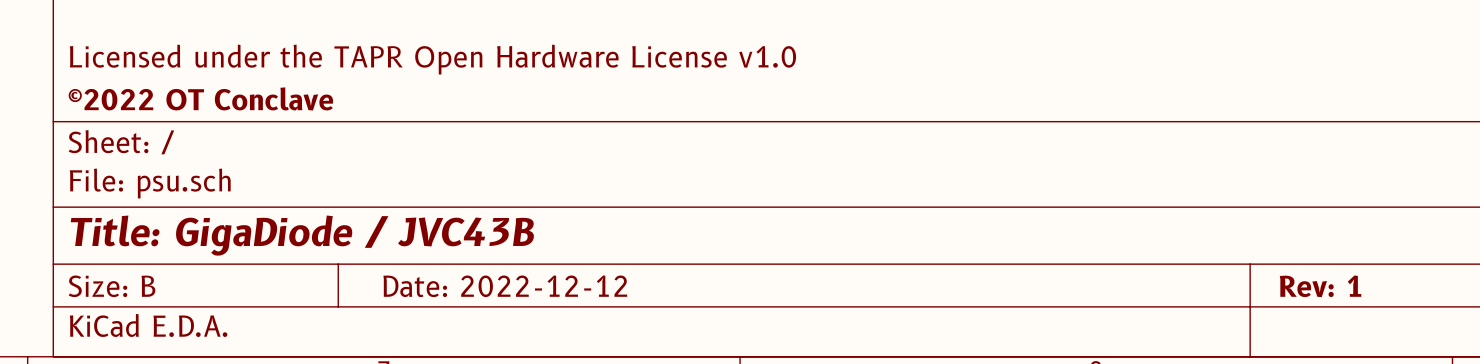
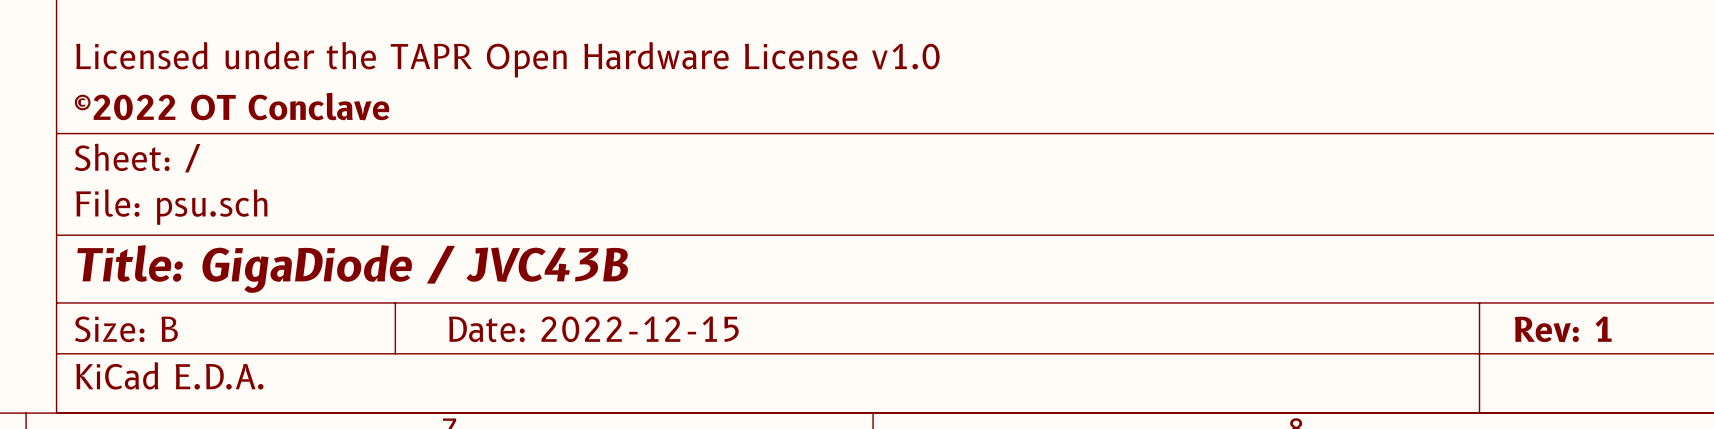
title block: Date: 2022-12-12 (505, 286) -> Date: 2022-12-15 (593, 329)

